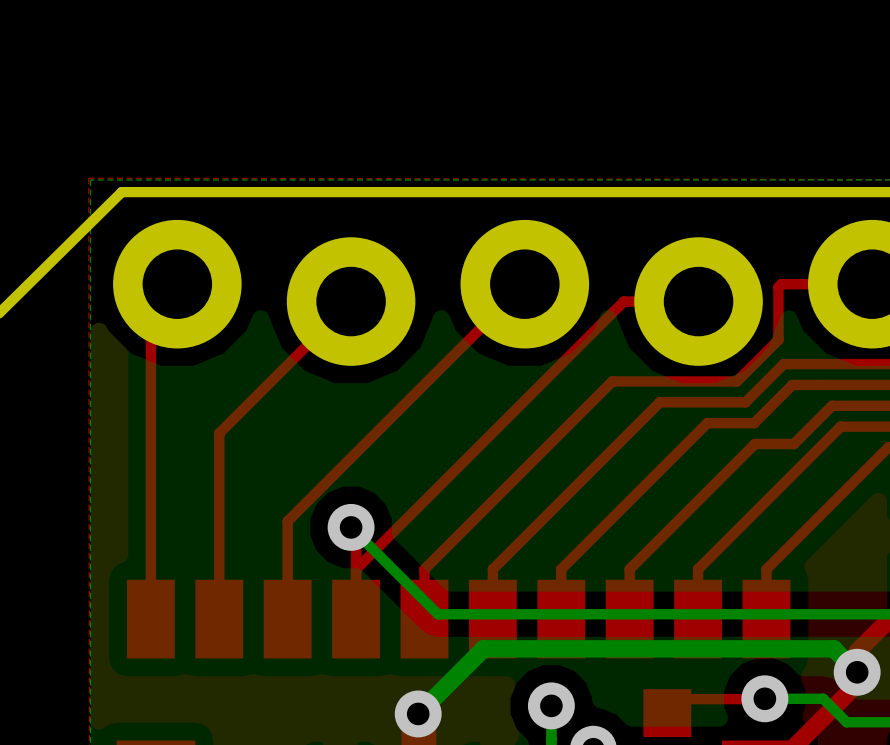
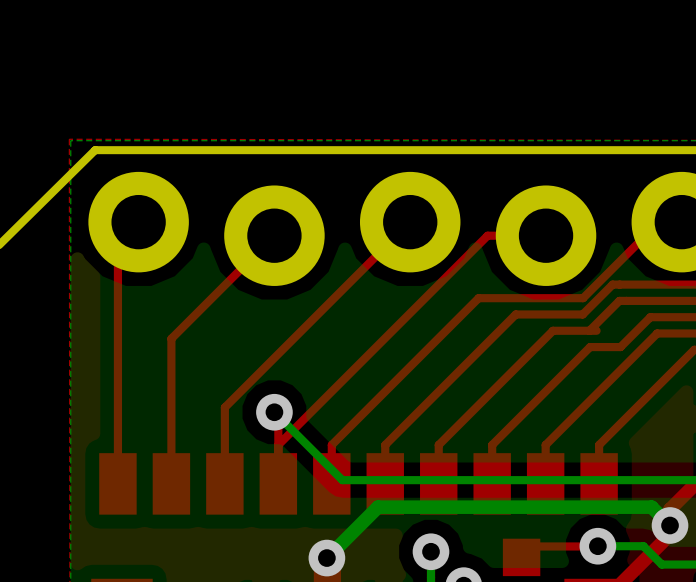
top track: (872, 284) (781, 284) (778, 287) (778, 339) (736, 381) -> (660, 220) (583, 298) (576, 298)

